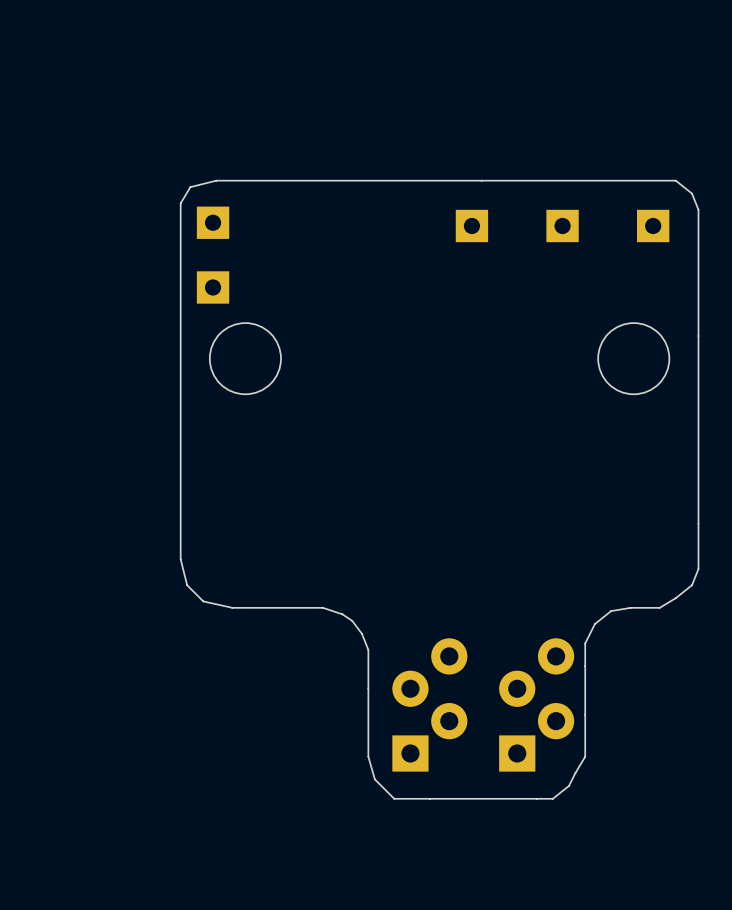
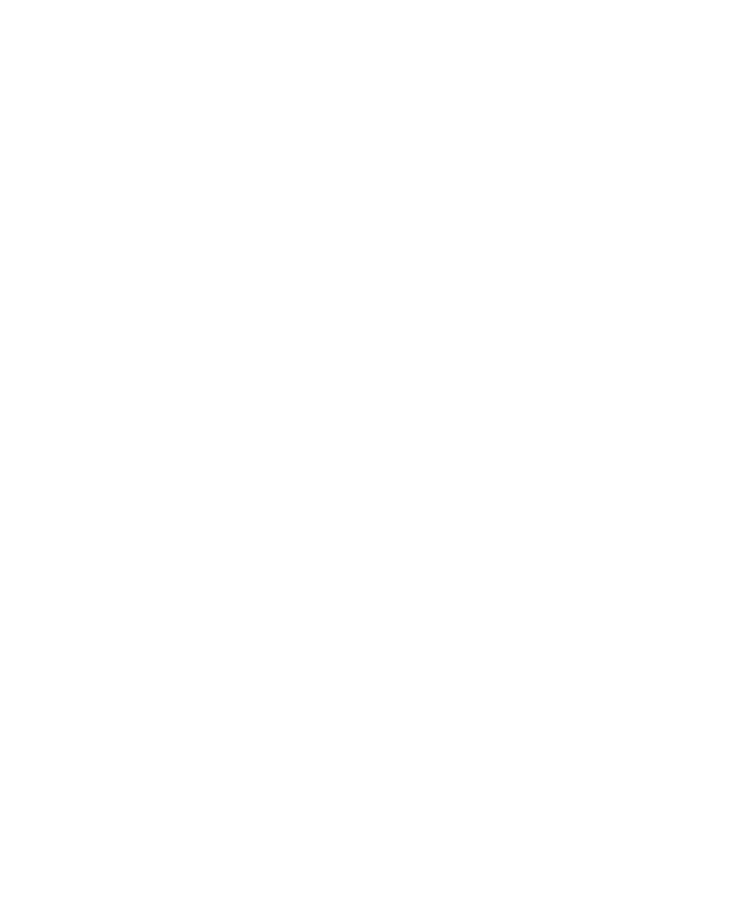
board edge: (675, 180) (216, 180) (190, 187) (180, 203) (180, 559) (187, 585) (203, 601) (232, 607) (323, 607) (342, 614) (352, 620) (361, 633) (368, 649) (368, 756) (374, 779) (394, 798) (552, 798) (569, 785) (585, 756) (585, 643) (594, 624) (611, 611) (630, 607) (659, 607) (692, 585) (698, 569) (698, 209) (692, 193) (675, 180) -> none
part: (213, 222) -> none
part: (471, 225) -> none
part: (562, 225) -> none
part: (653, 225) -> none
part: (213, 287) -> none
round board edge: [209, 322, 282, 396] -> none
round board edge: [597, 322, 671, 396] -> none
part: (429, 704) -> none
part: (536, 704) -> none

